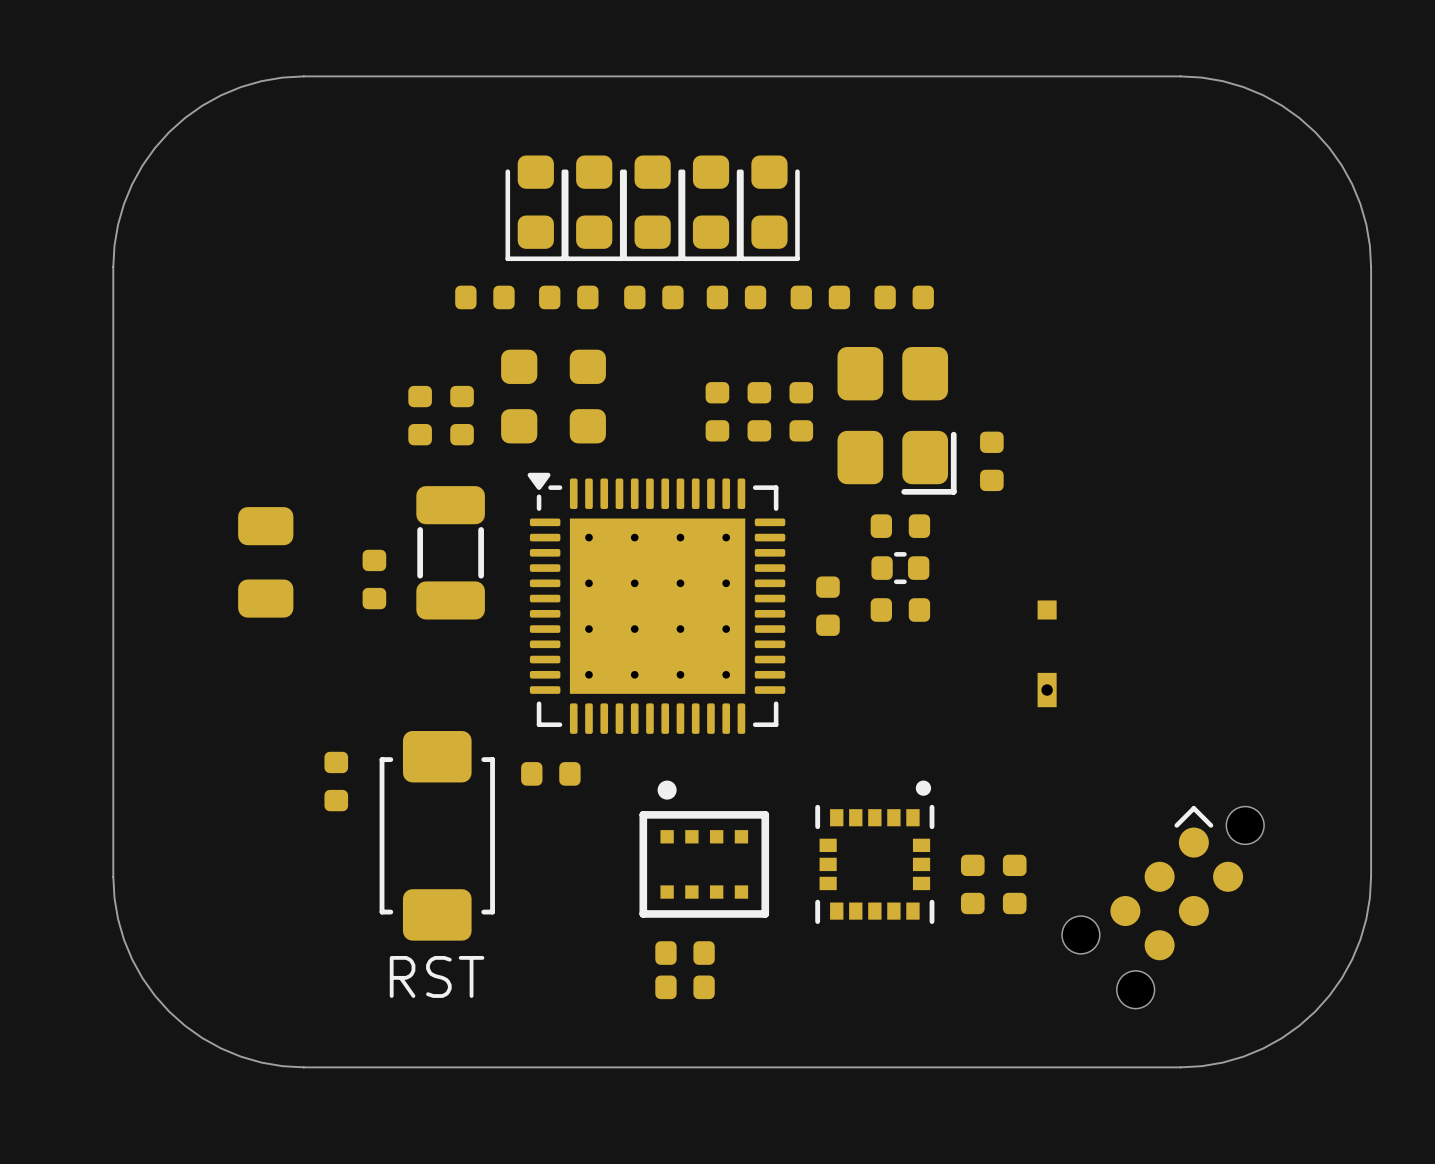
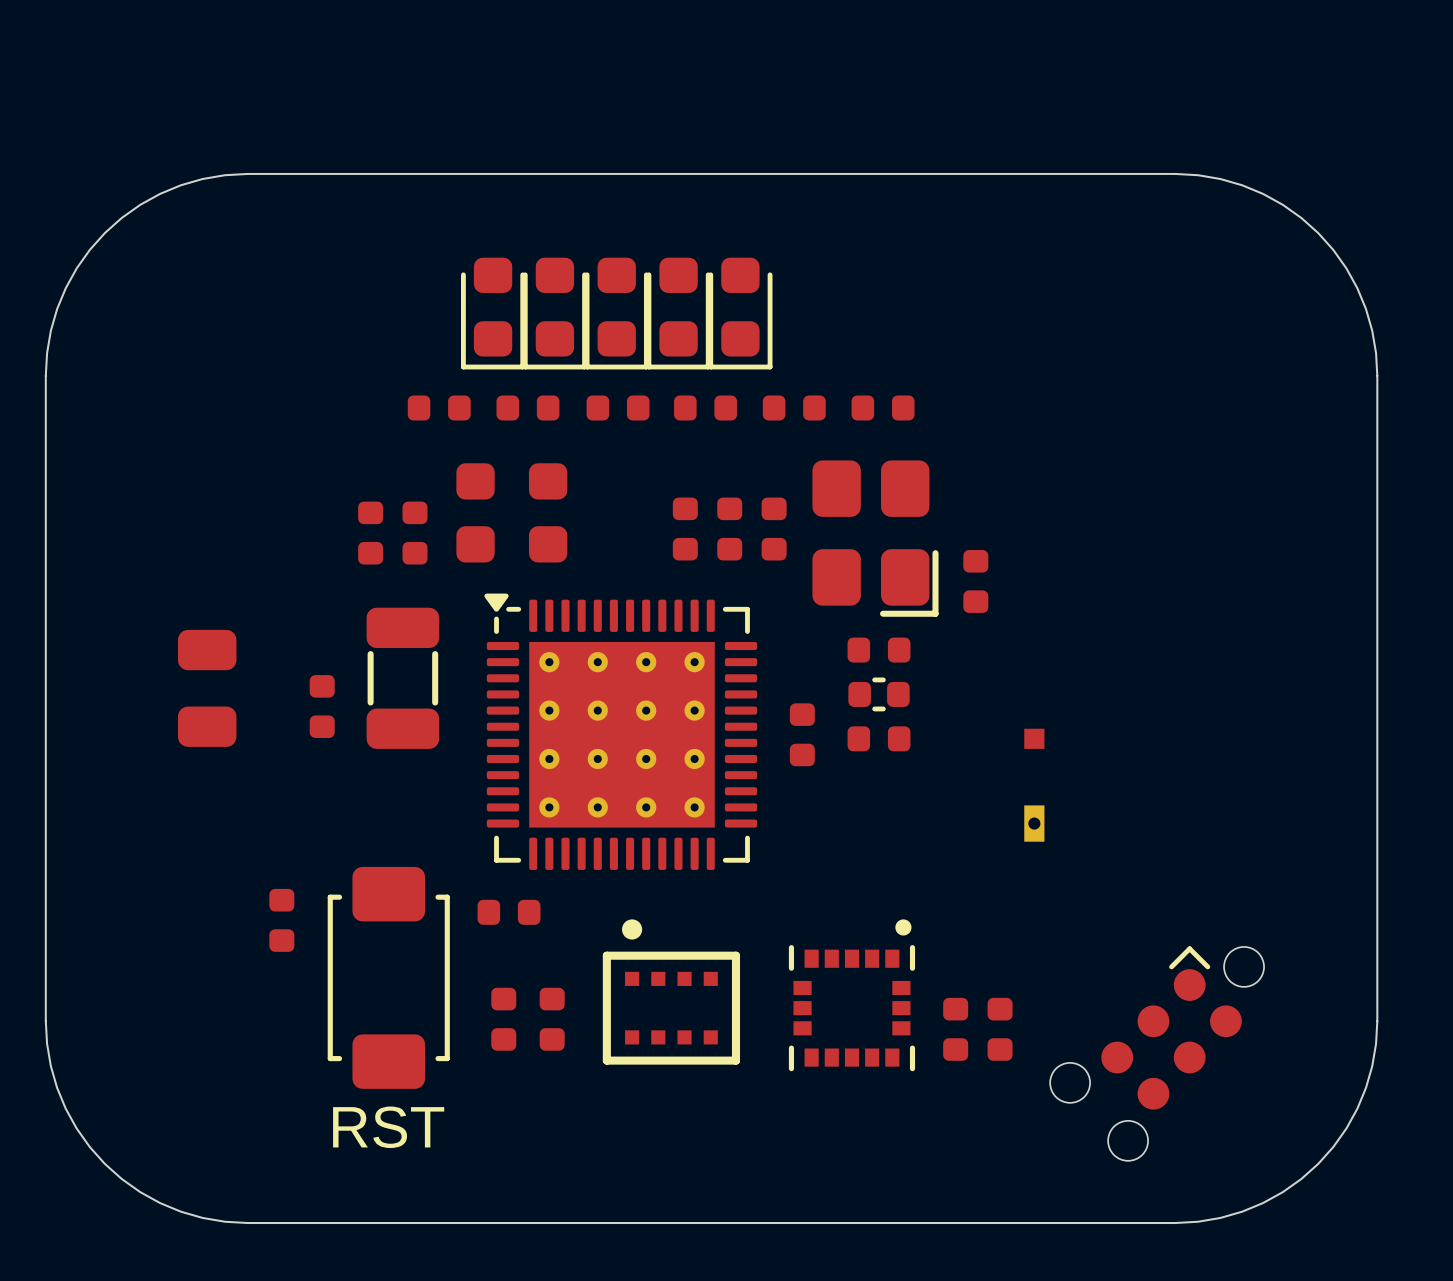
part: none -> (503, 1019)
part: none -> (552, 1019)
part: (685, 953) -> none
part: (685, 987) -> none

